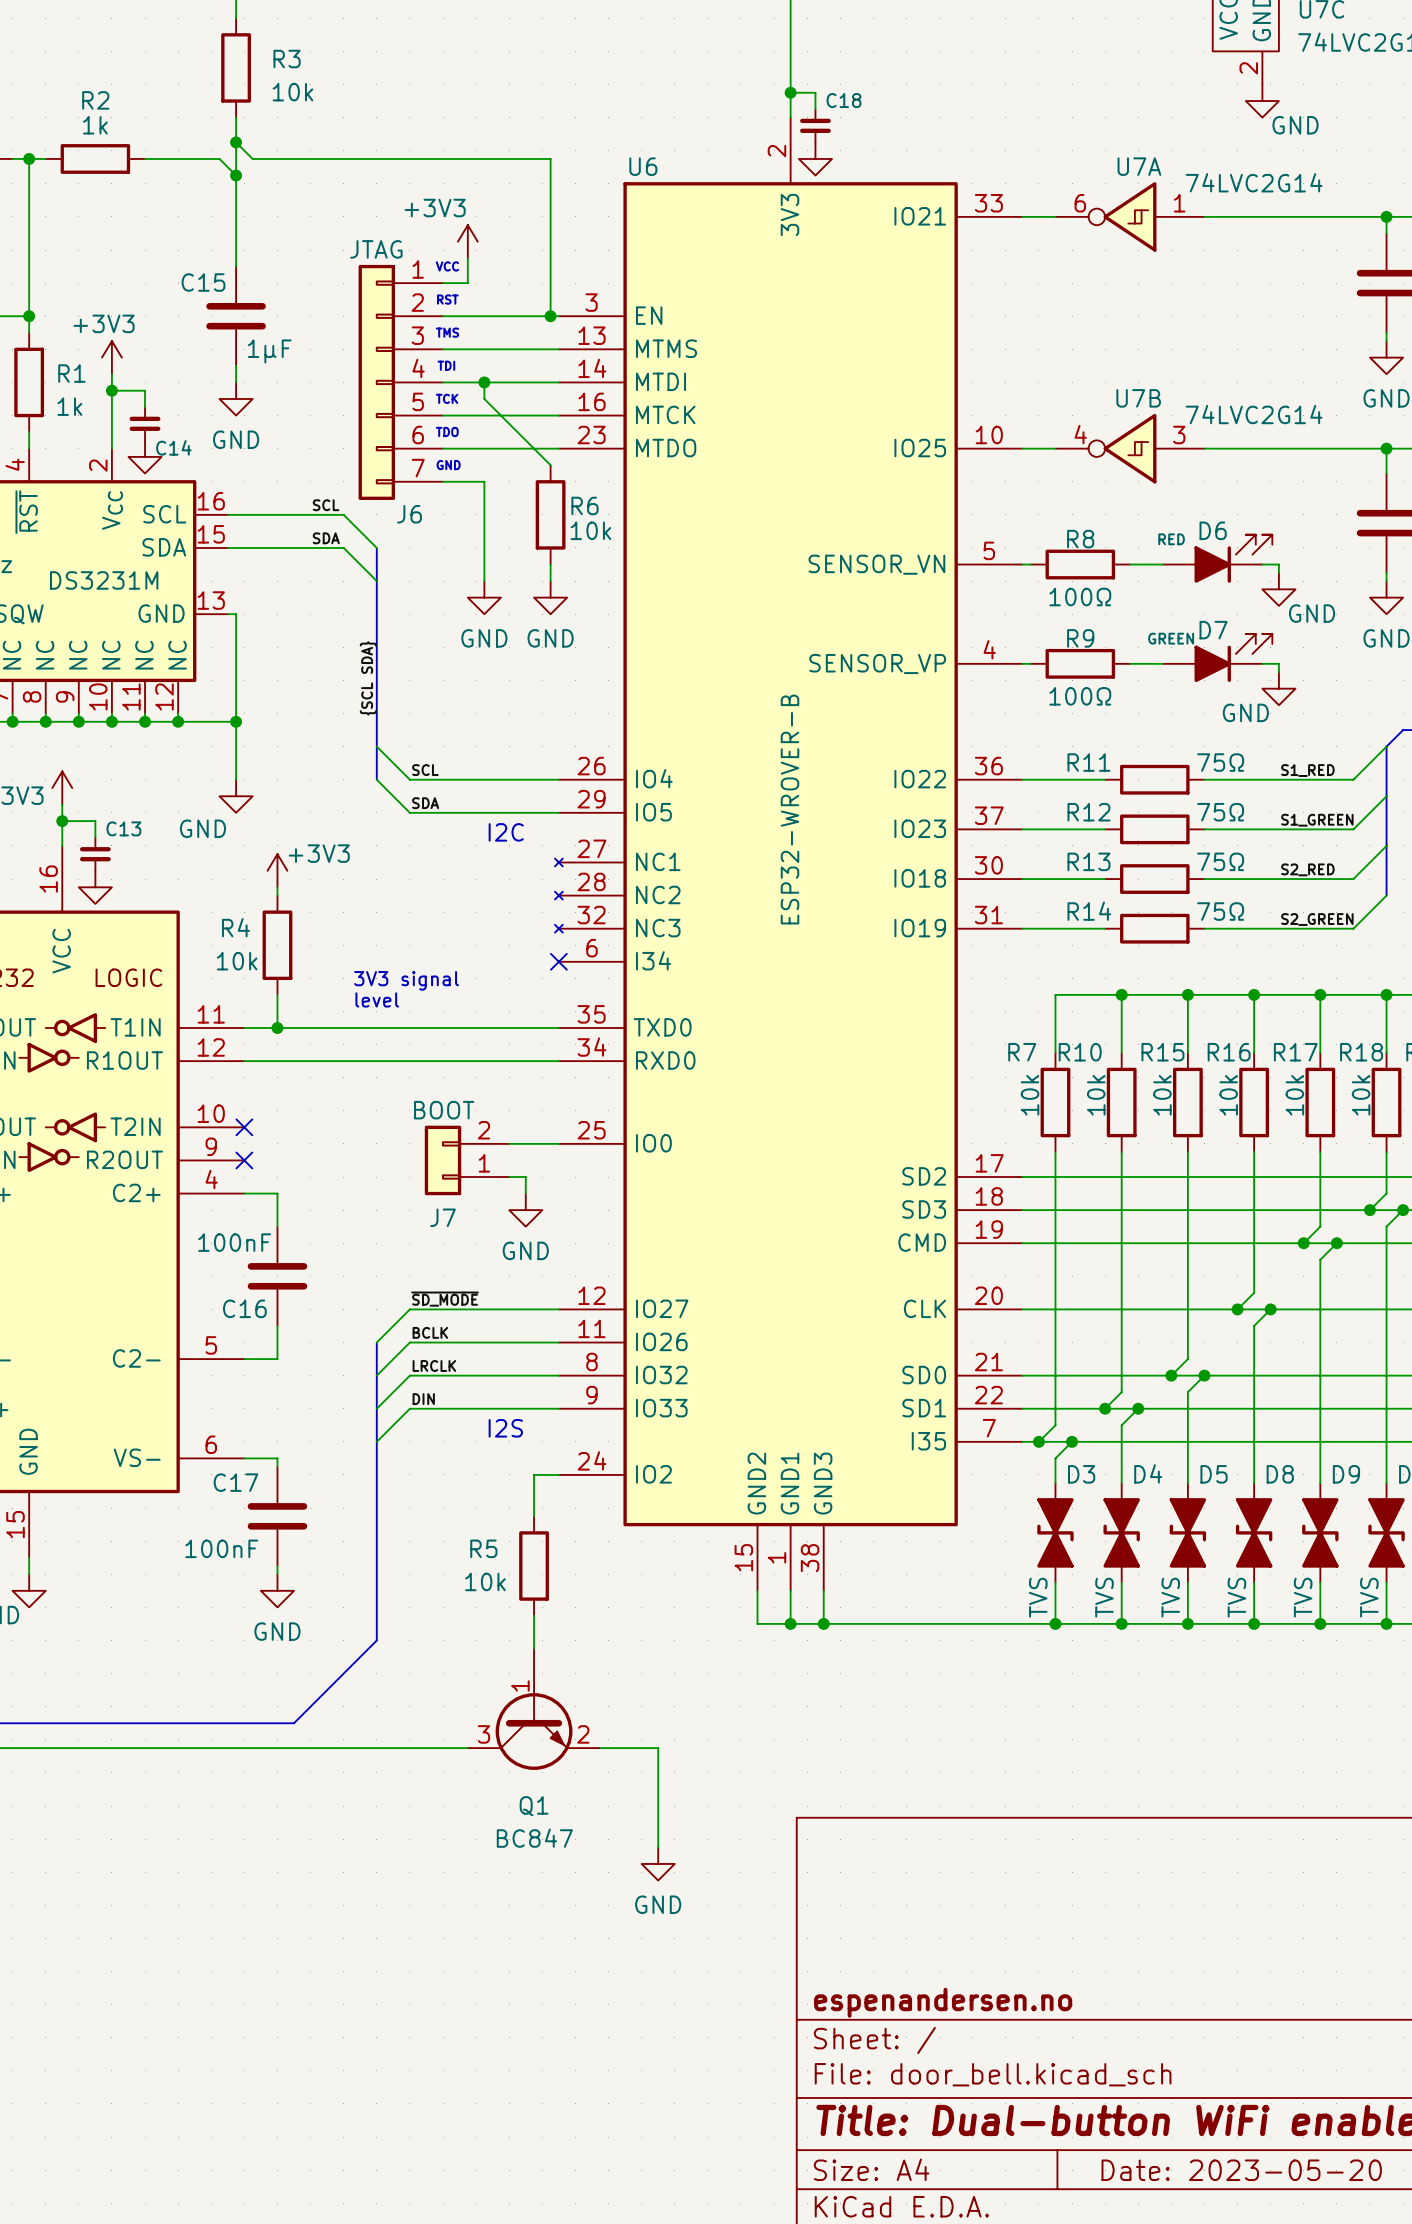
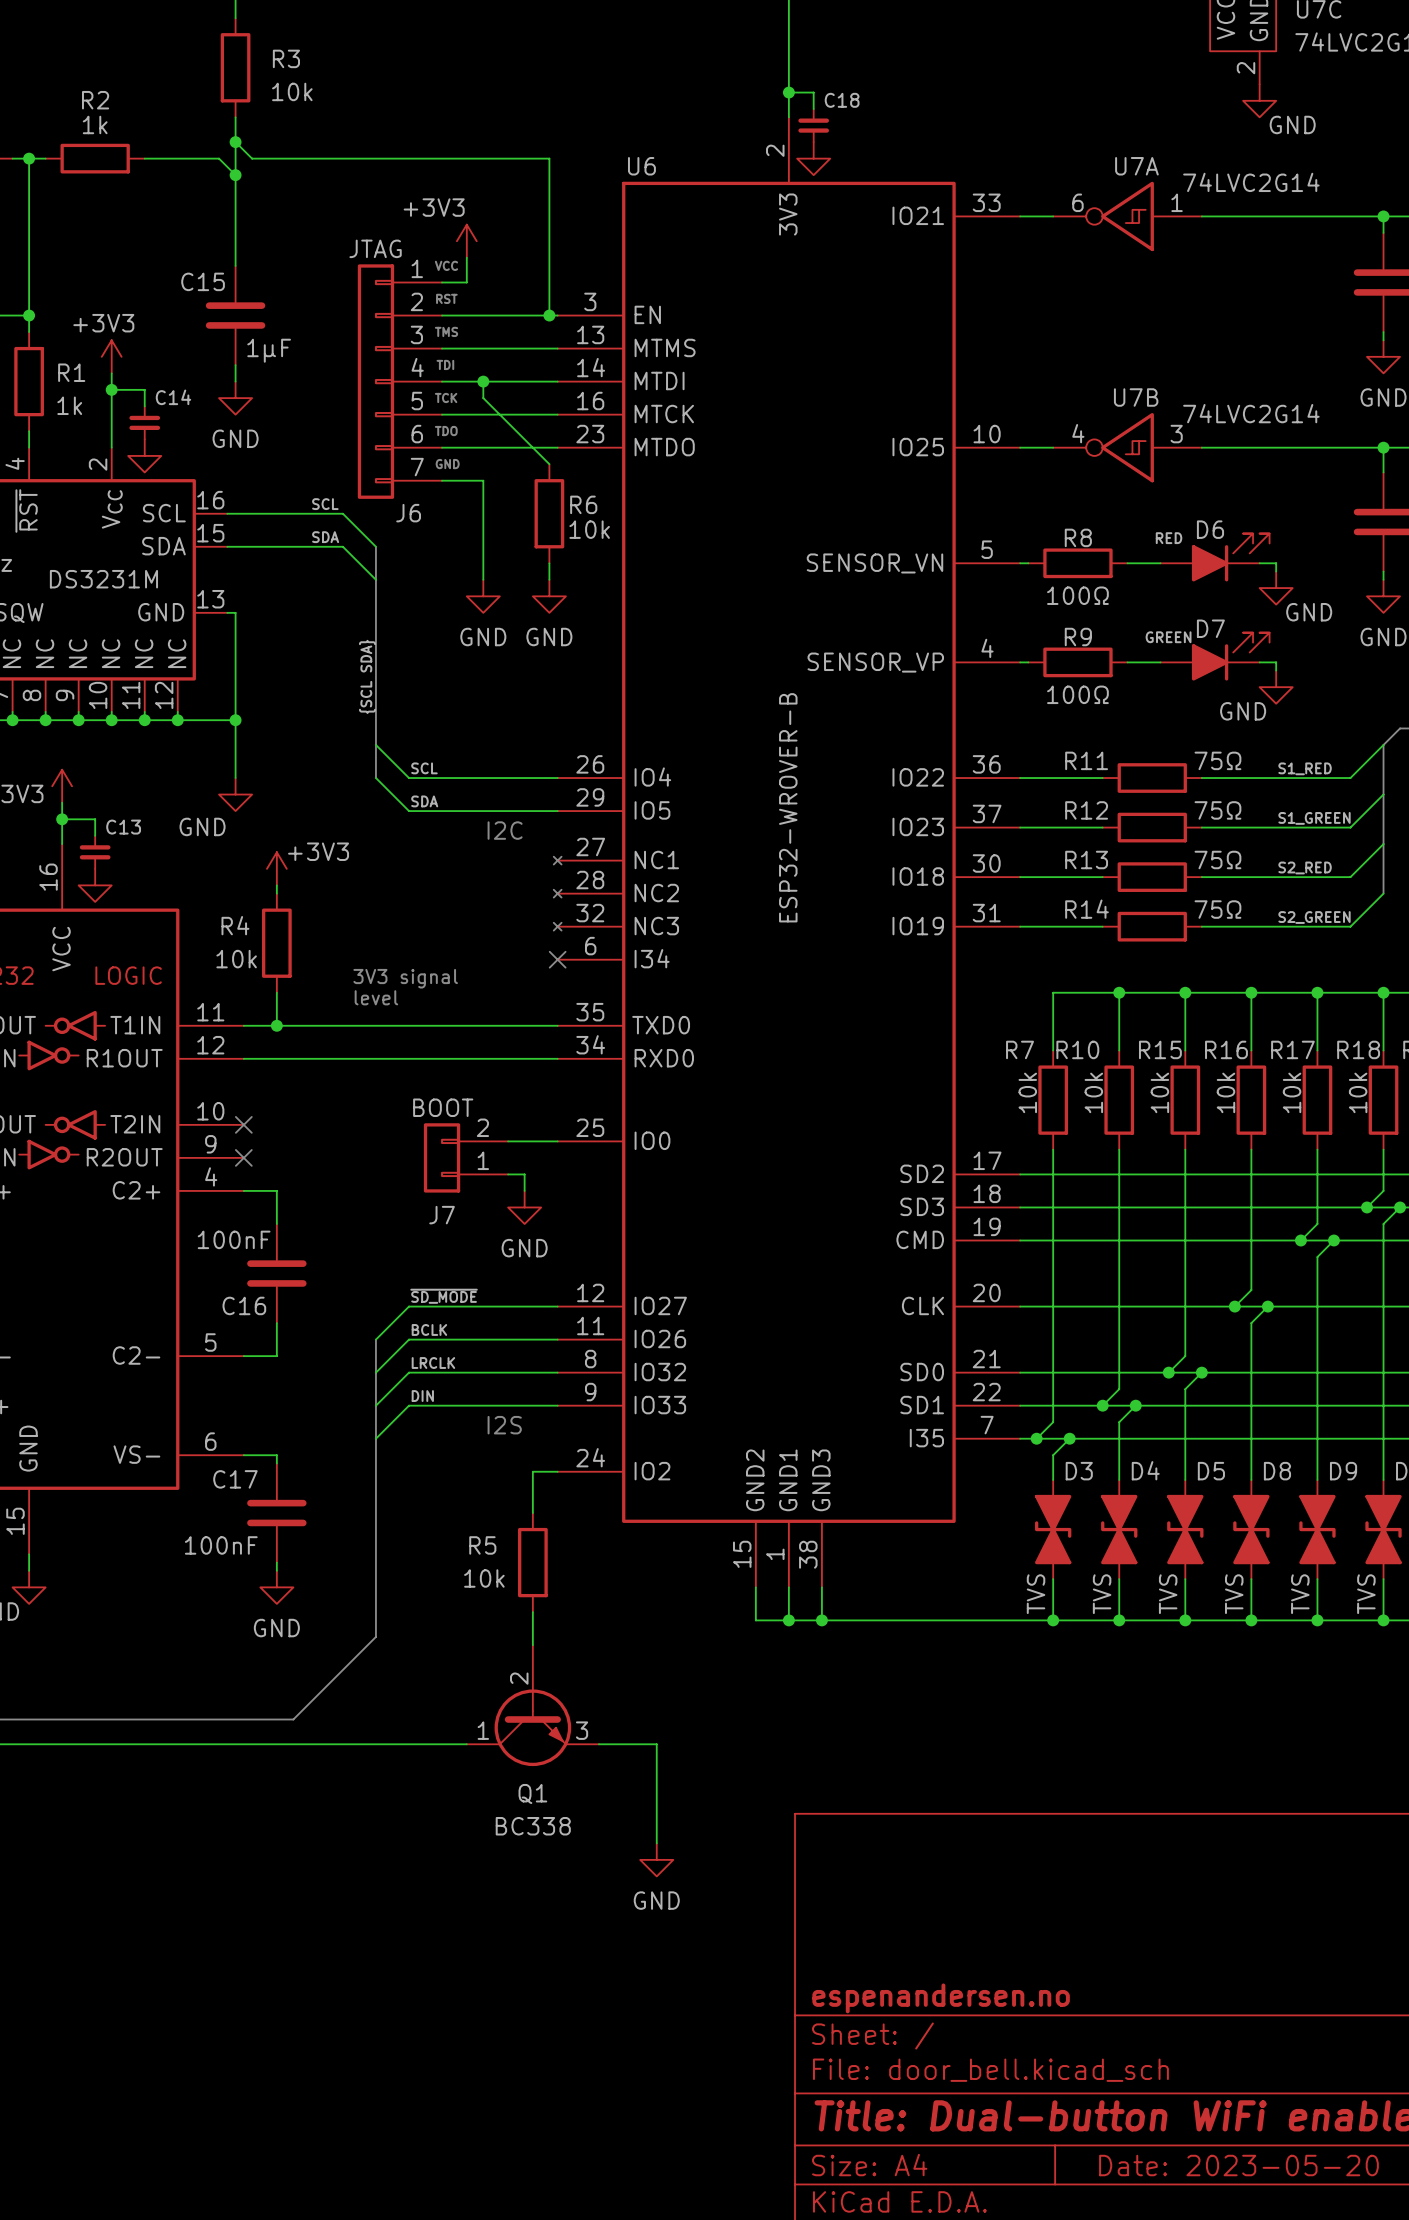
C14 name position: C14 (173, 447) -> C14 (173, 397)
Q1 symbol: [467, 1648, 601, 1770] -> [466, 1645, 599, 1767]
Q1 value: BC847 (534, 1838) -> BC338 (533, 1826)

